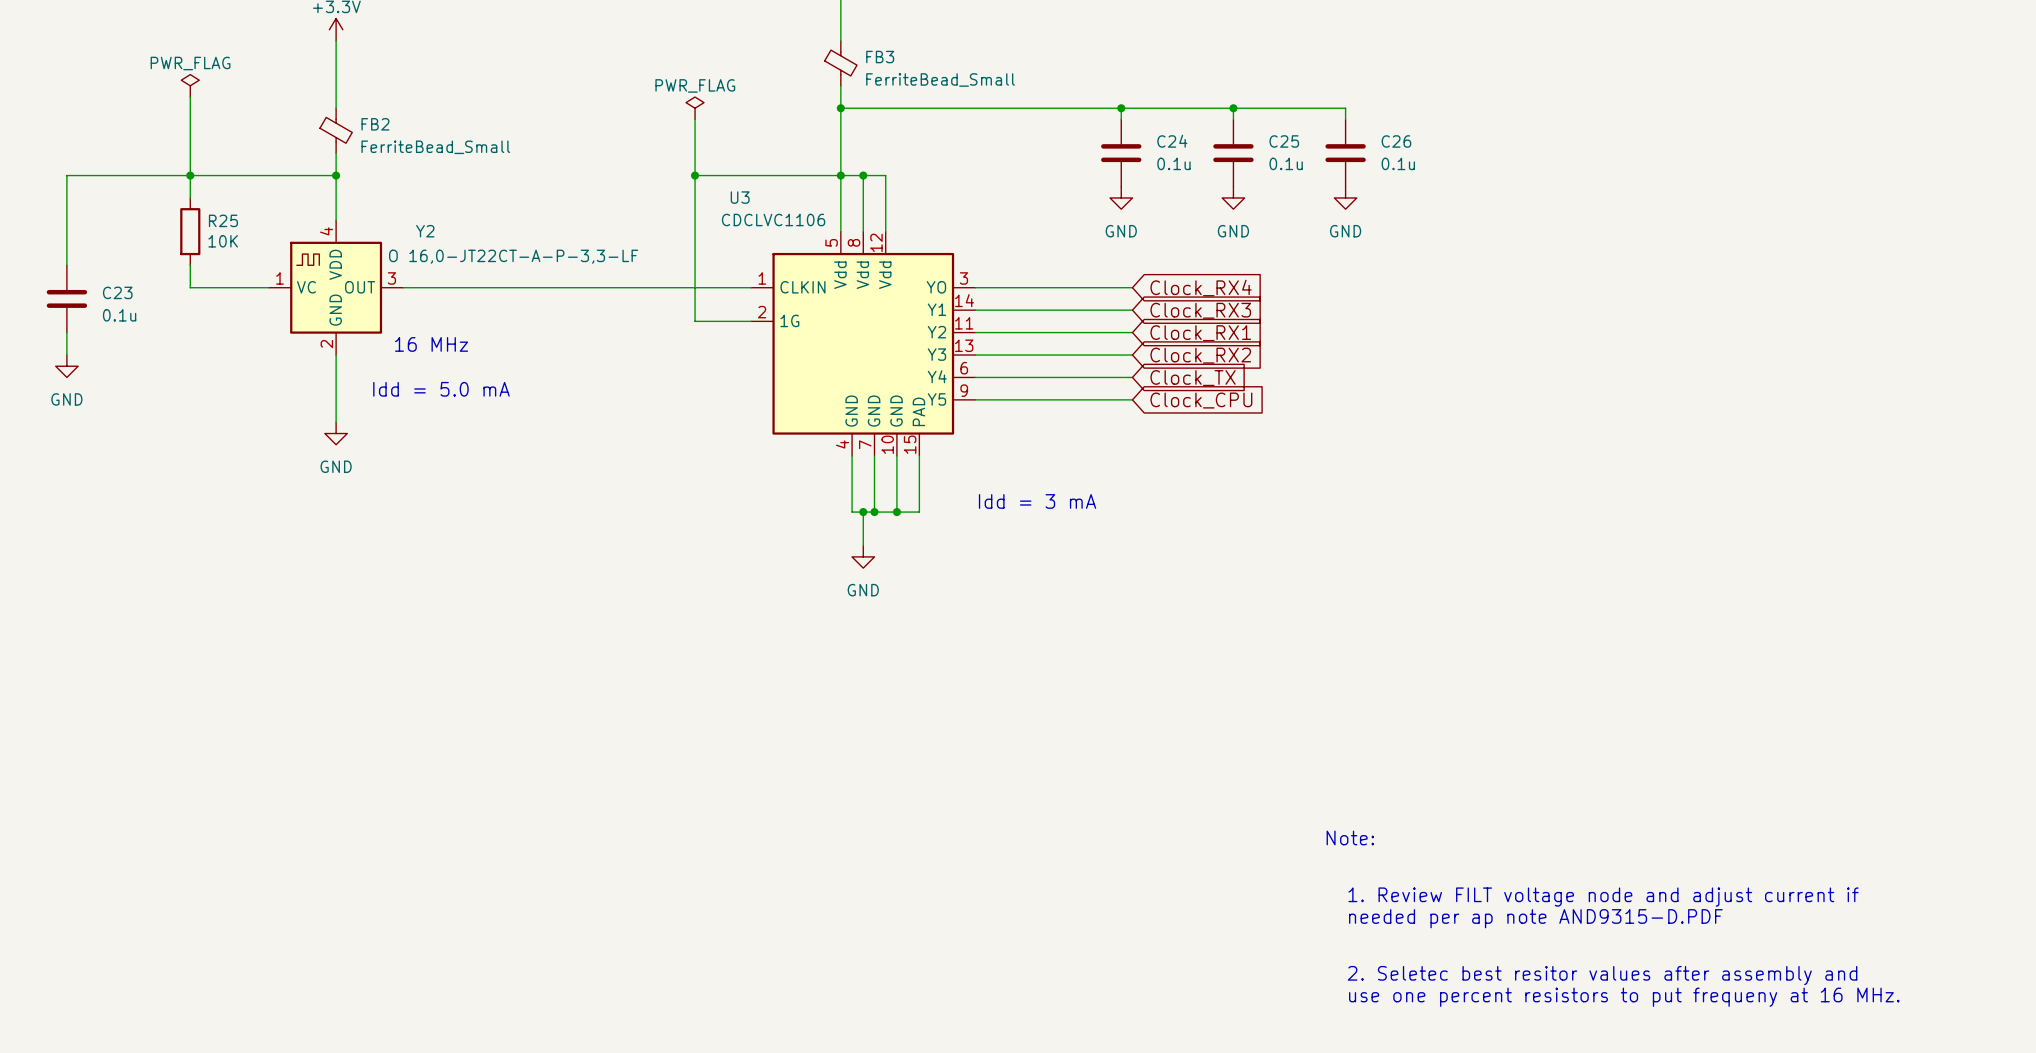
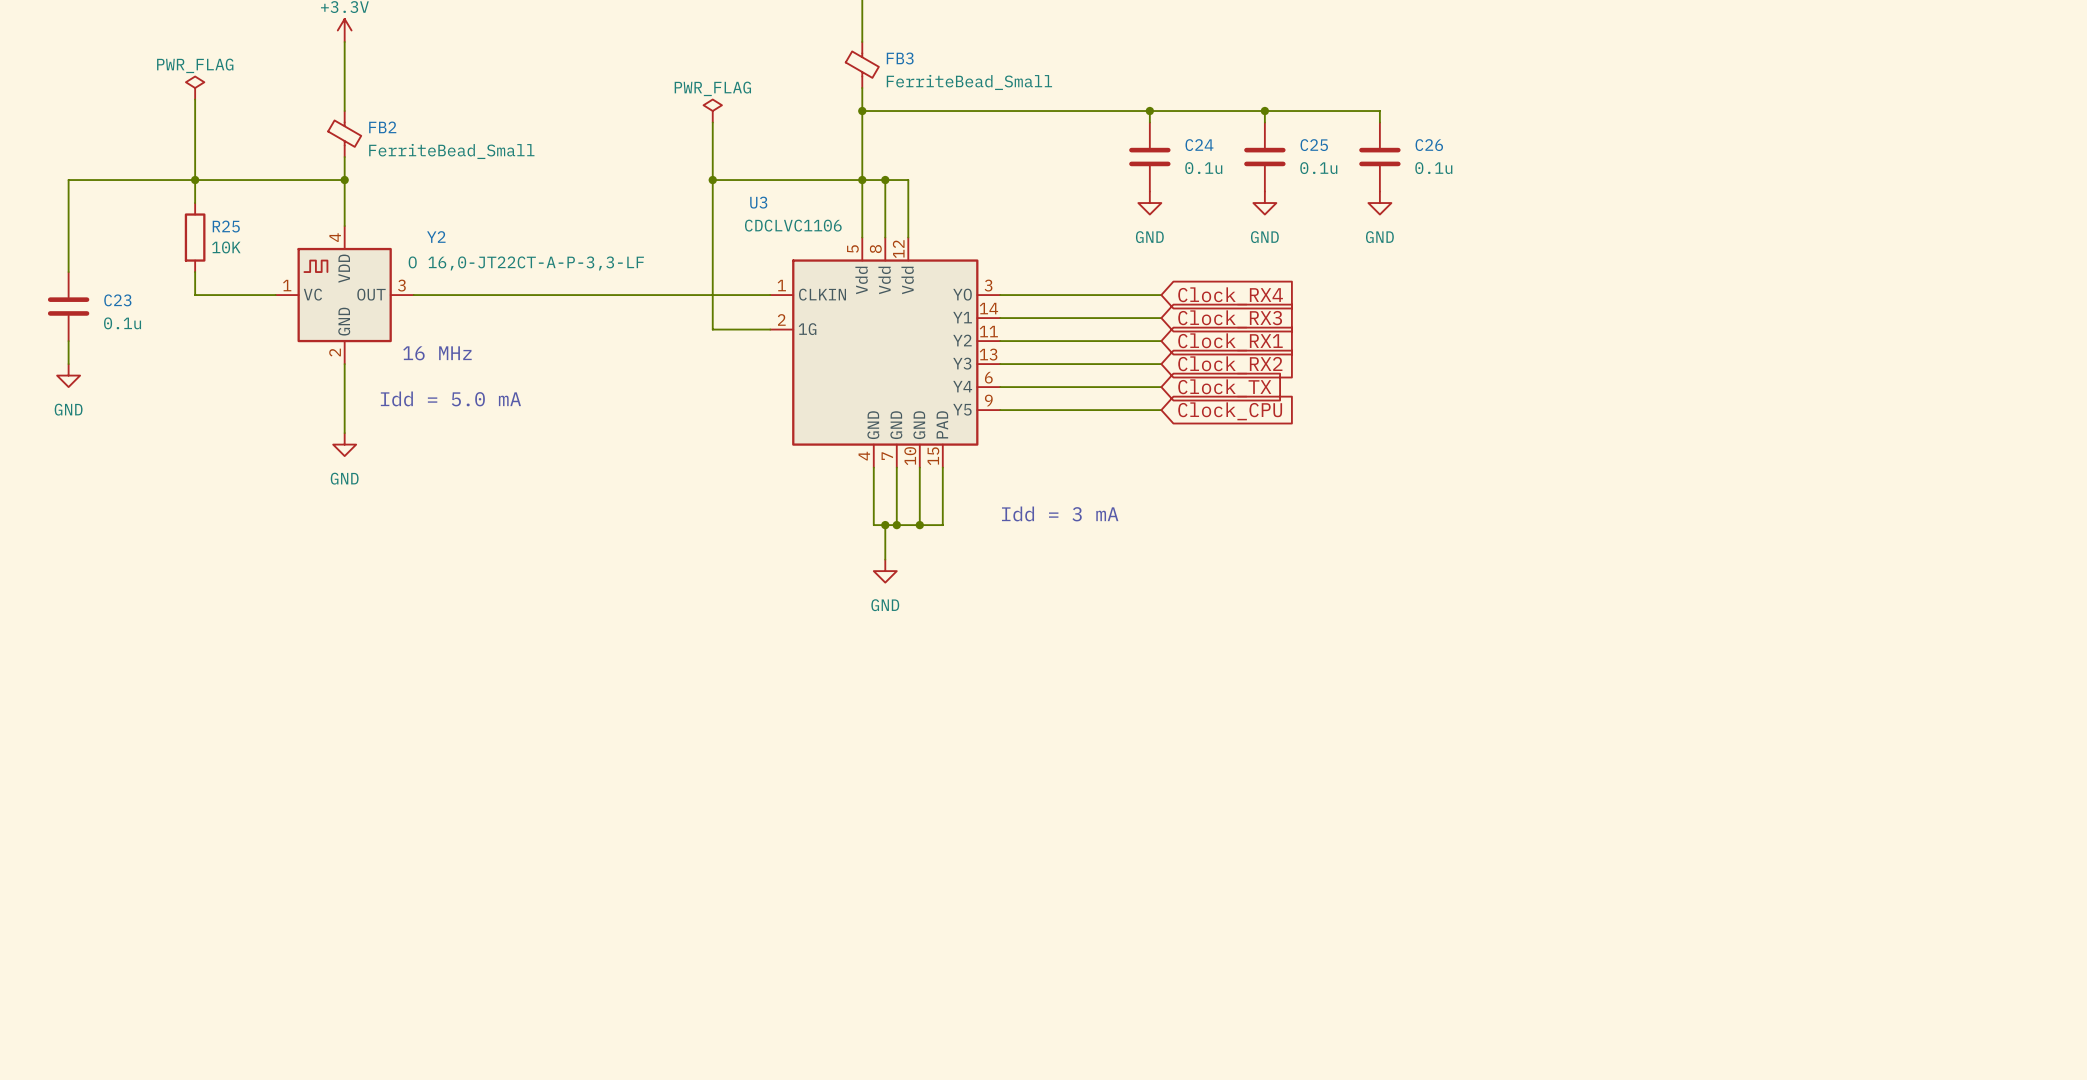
text: Note: (1350, 837) -> none
text: 1. Review FILT voltage node and adjust current if (1603, 897) -> none
text: needed per ap note AND9315-D.PDF (1535, 918) -> none
text: 2. Seletec best resitor values after assembly and (1602, 975) -> none
text: use one percent resistors to put frequeny at 16 MHz. (1624, 997) -> none

